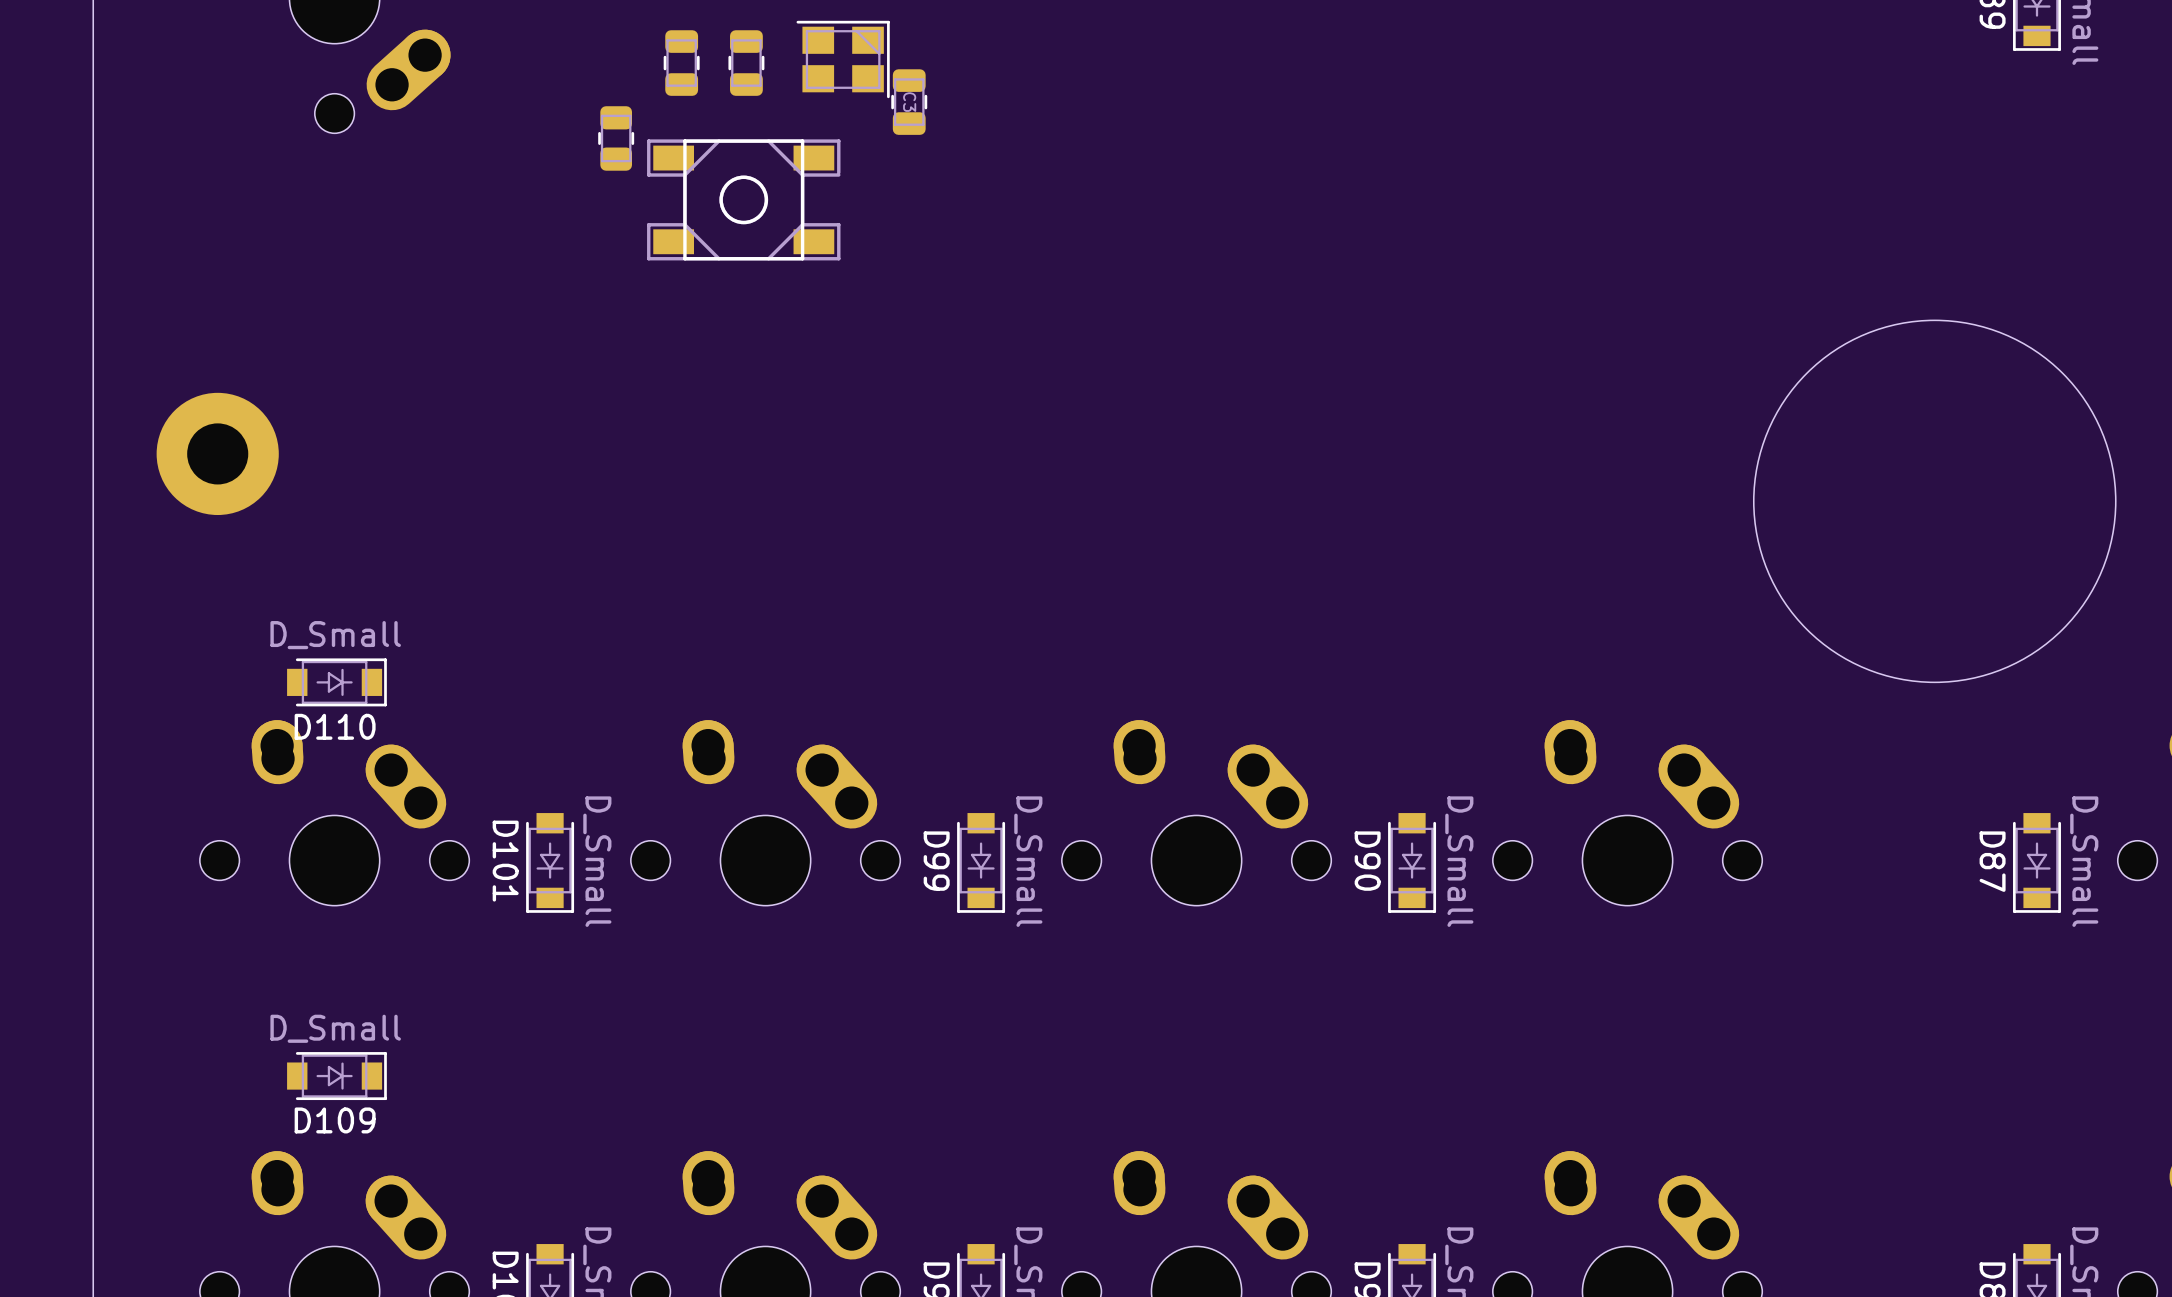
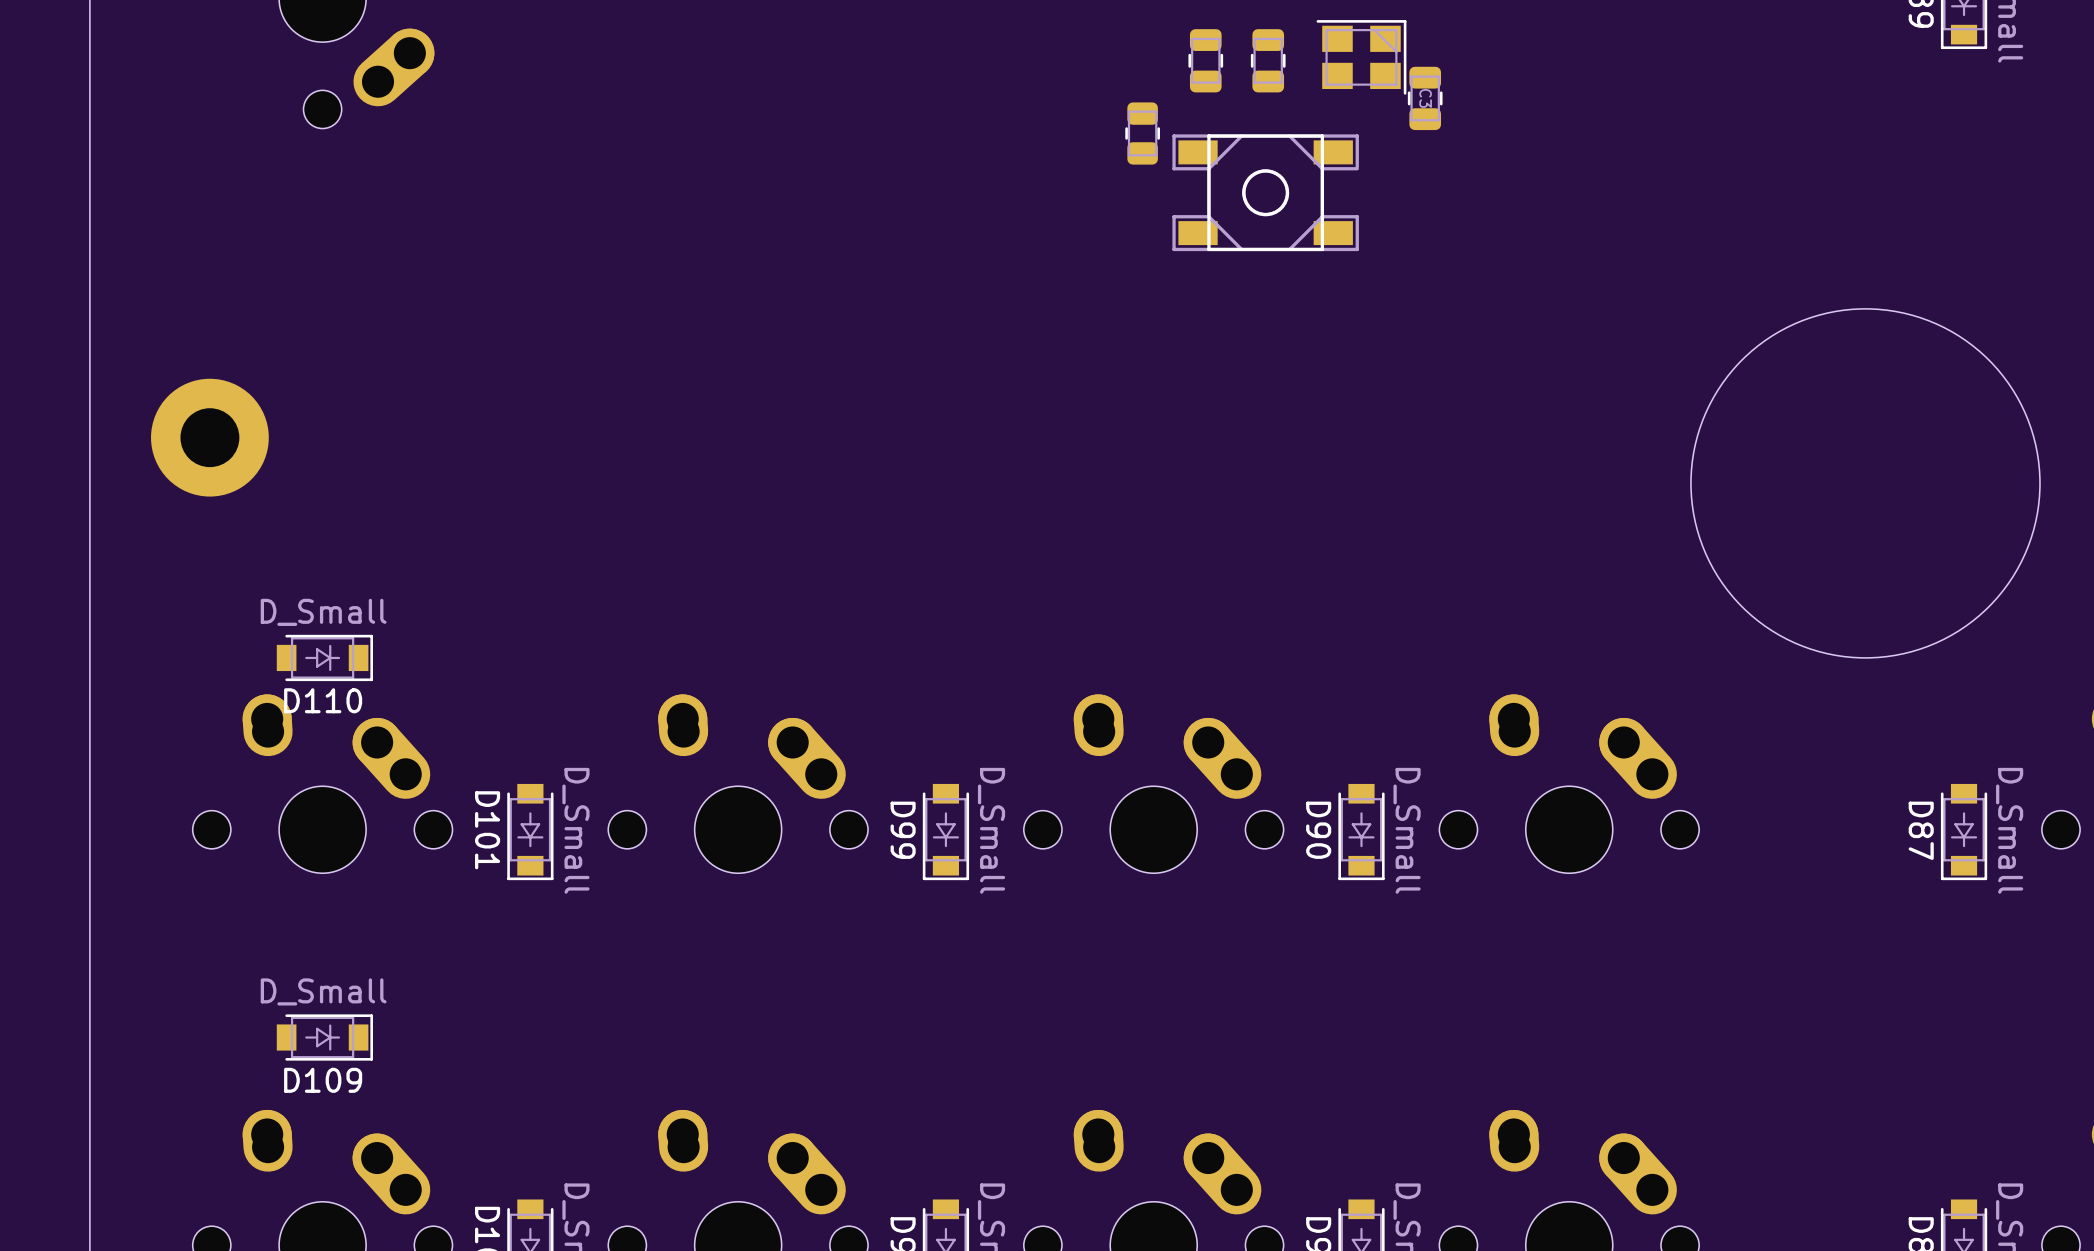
part: (843, 59) -> none
part: none -> (1361, 57)
part: (681, 63) -> none
part: (746, 63) -> none
part: none -> (1205, 60)
part: none -> (1268, 60)
C3 position: (909, 102) -> (1425, 98)
part: (616, 138) -> none
part: none -> (1142, 133)
part: (743, 199) -> none
part: none -> (1265, 192)

